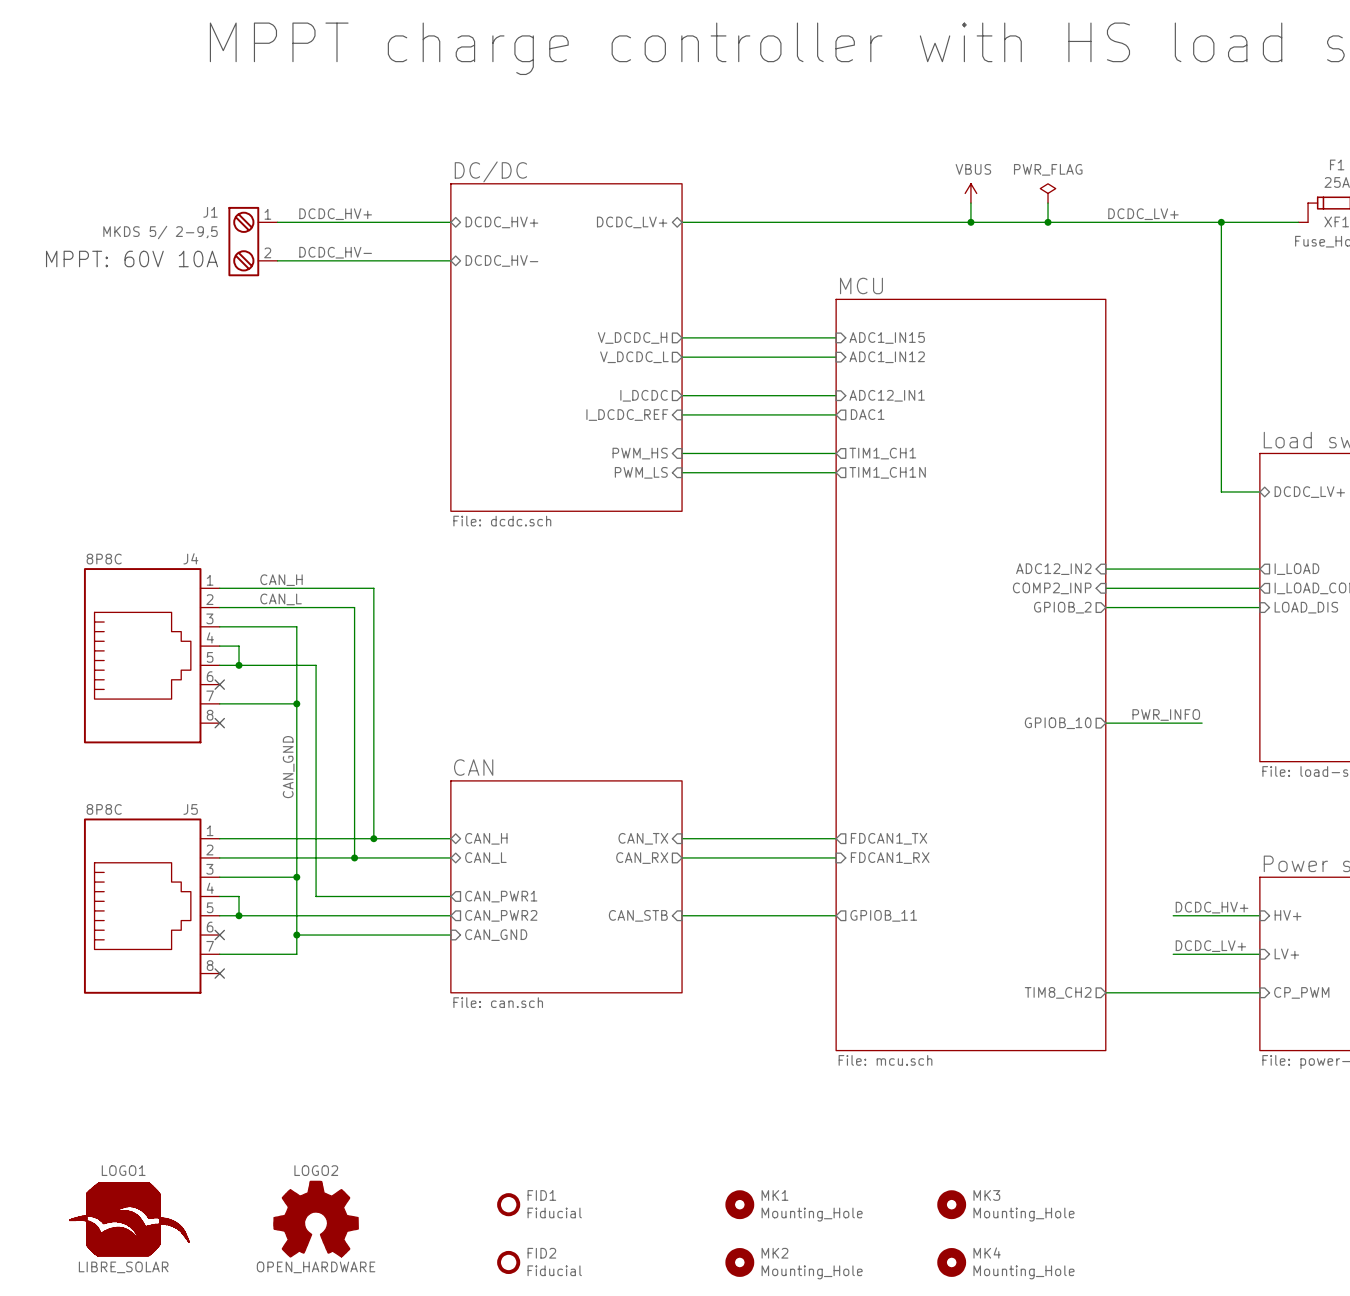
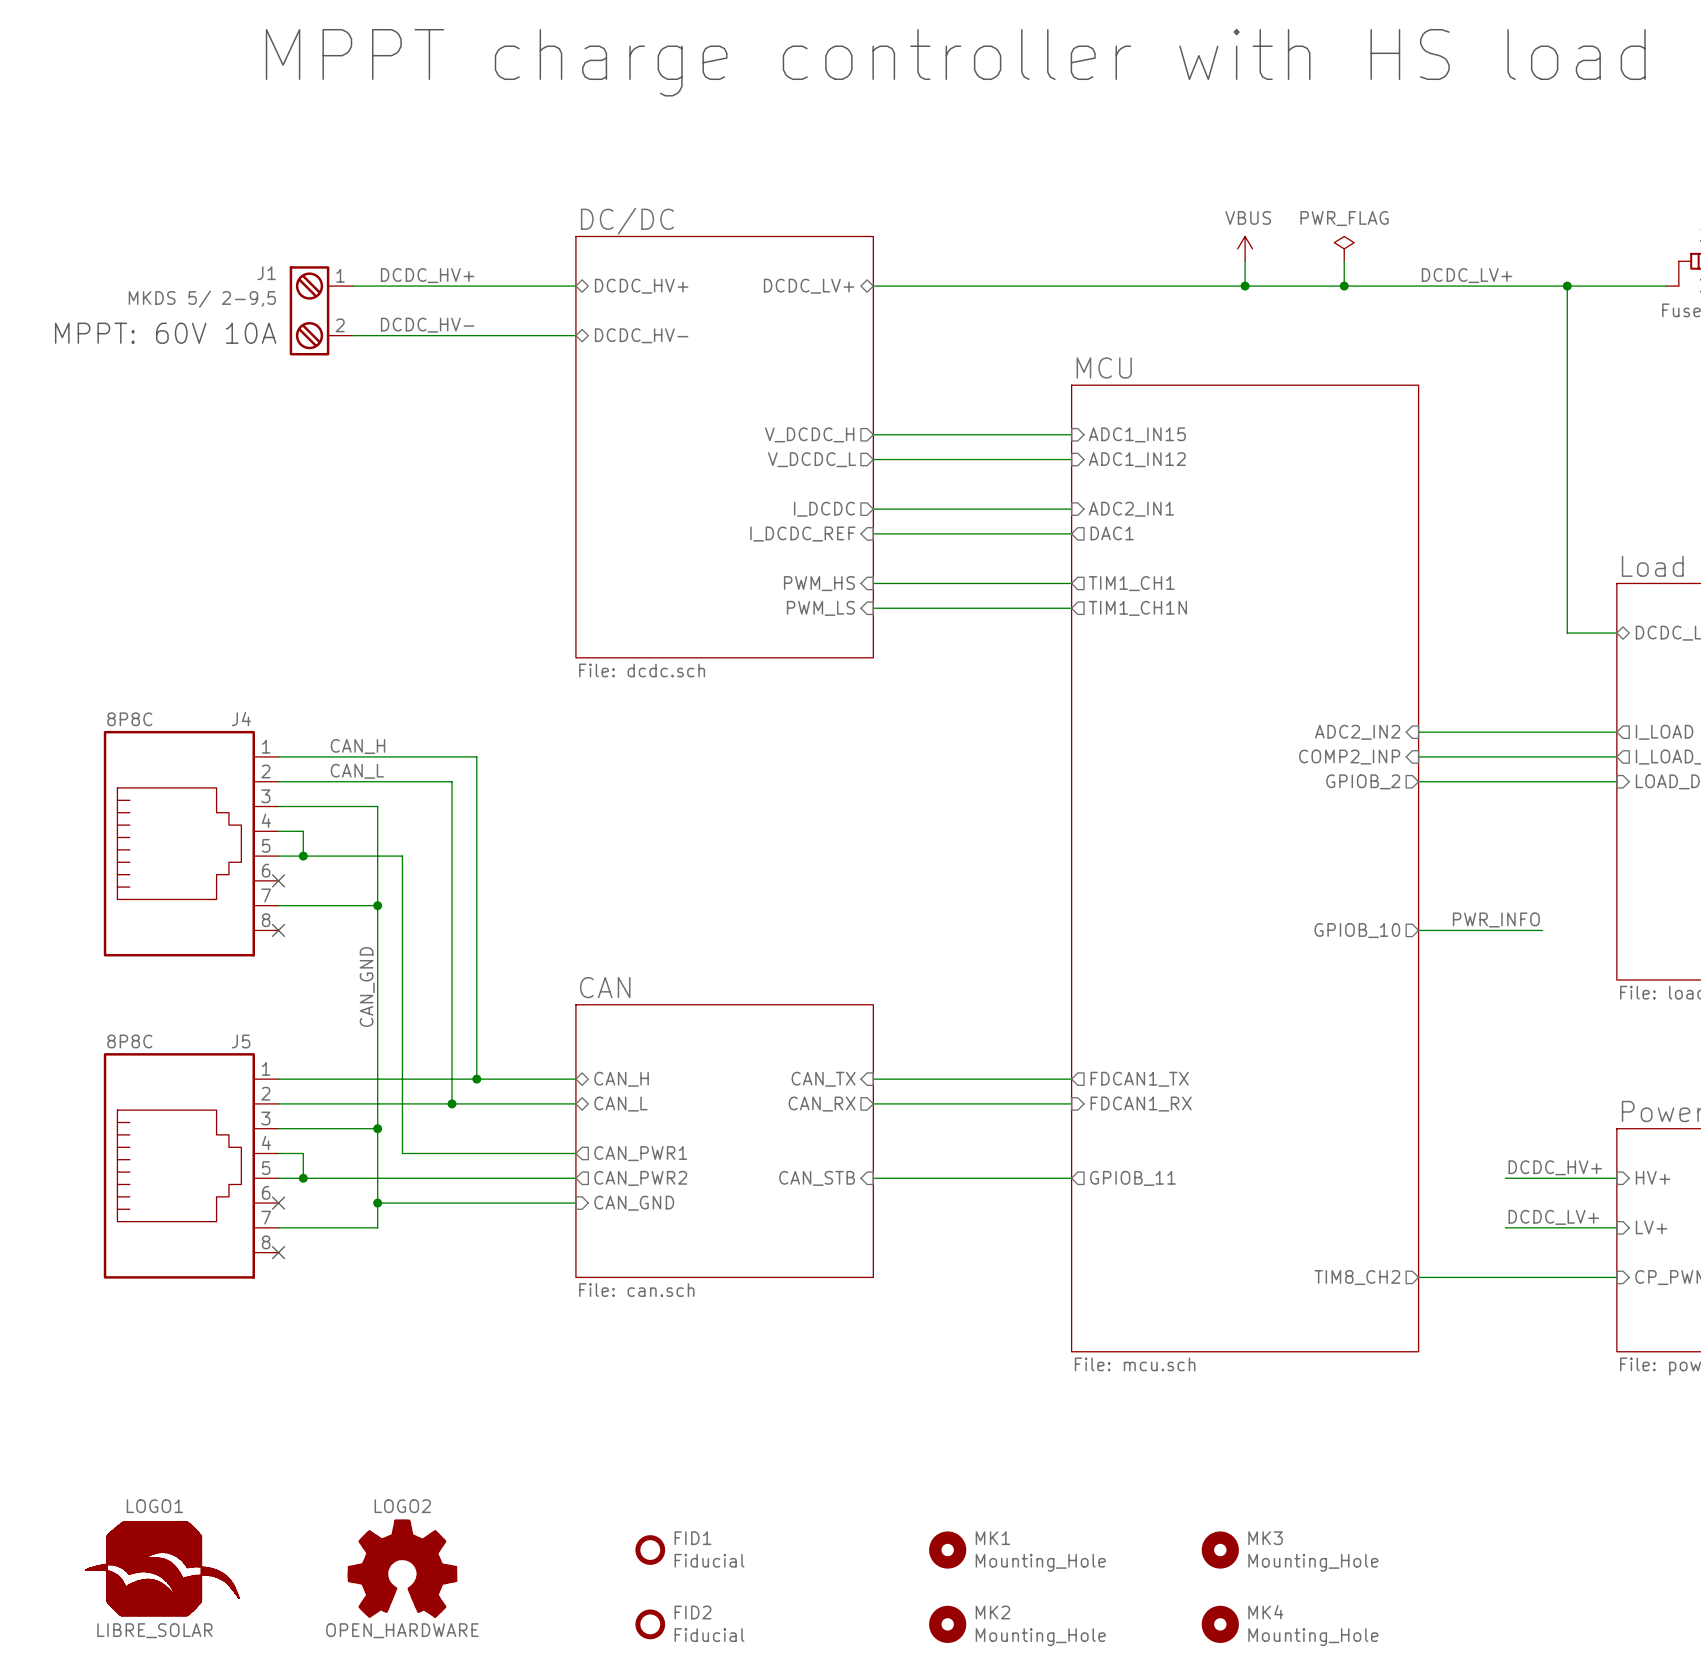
sheet pin: ADC12_IN1 (887, 395) -> ADC2_IN1 (1131, 509)
sheet pin: ADC12_IN2 (1053, 569) -> ADC2_IN2 (1357, 732)

